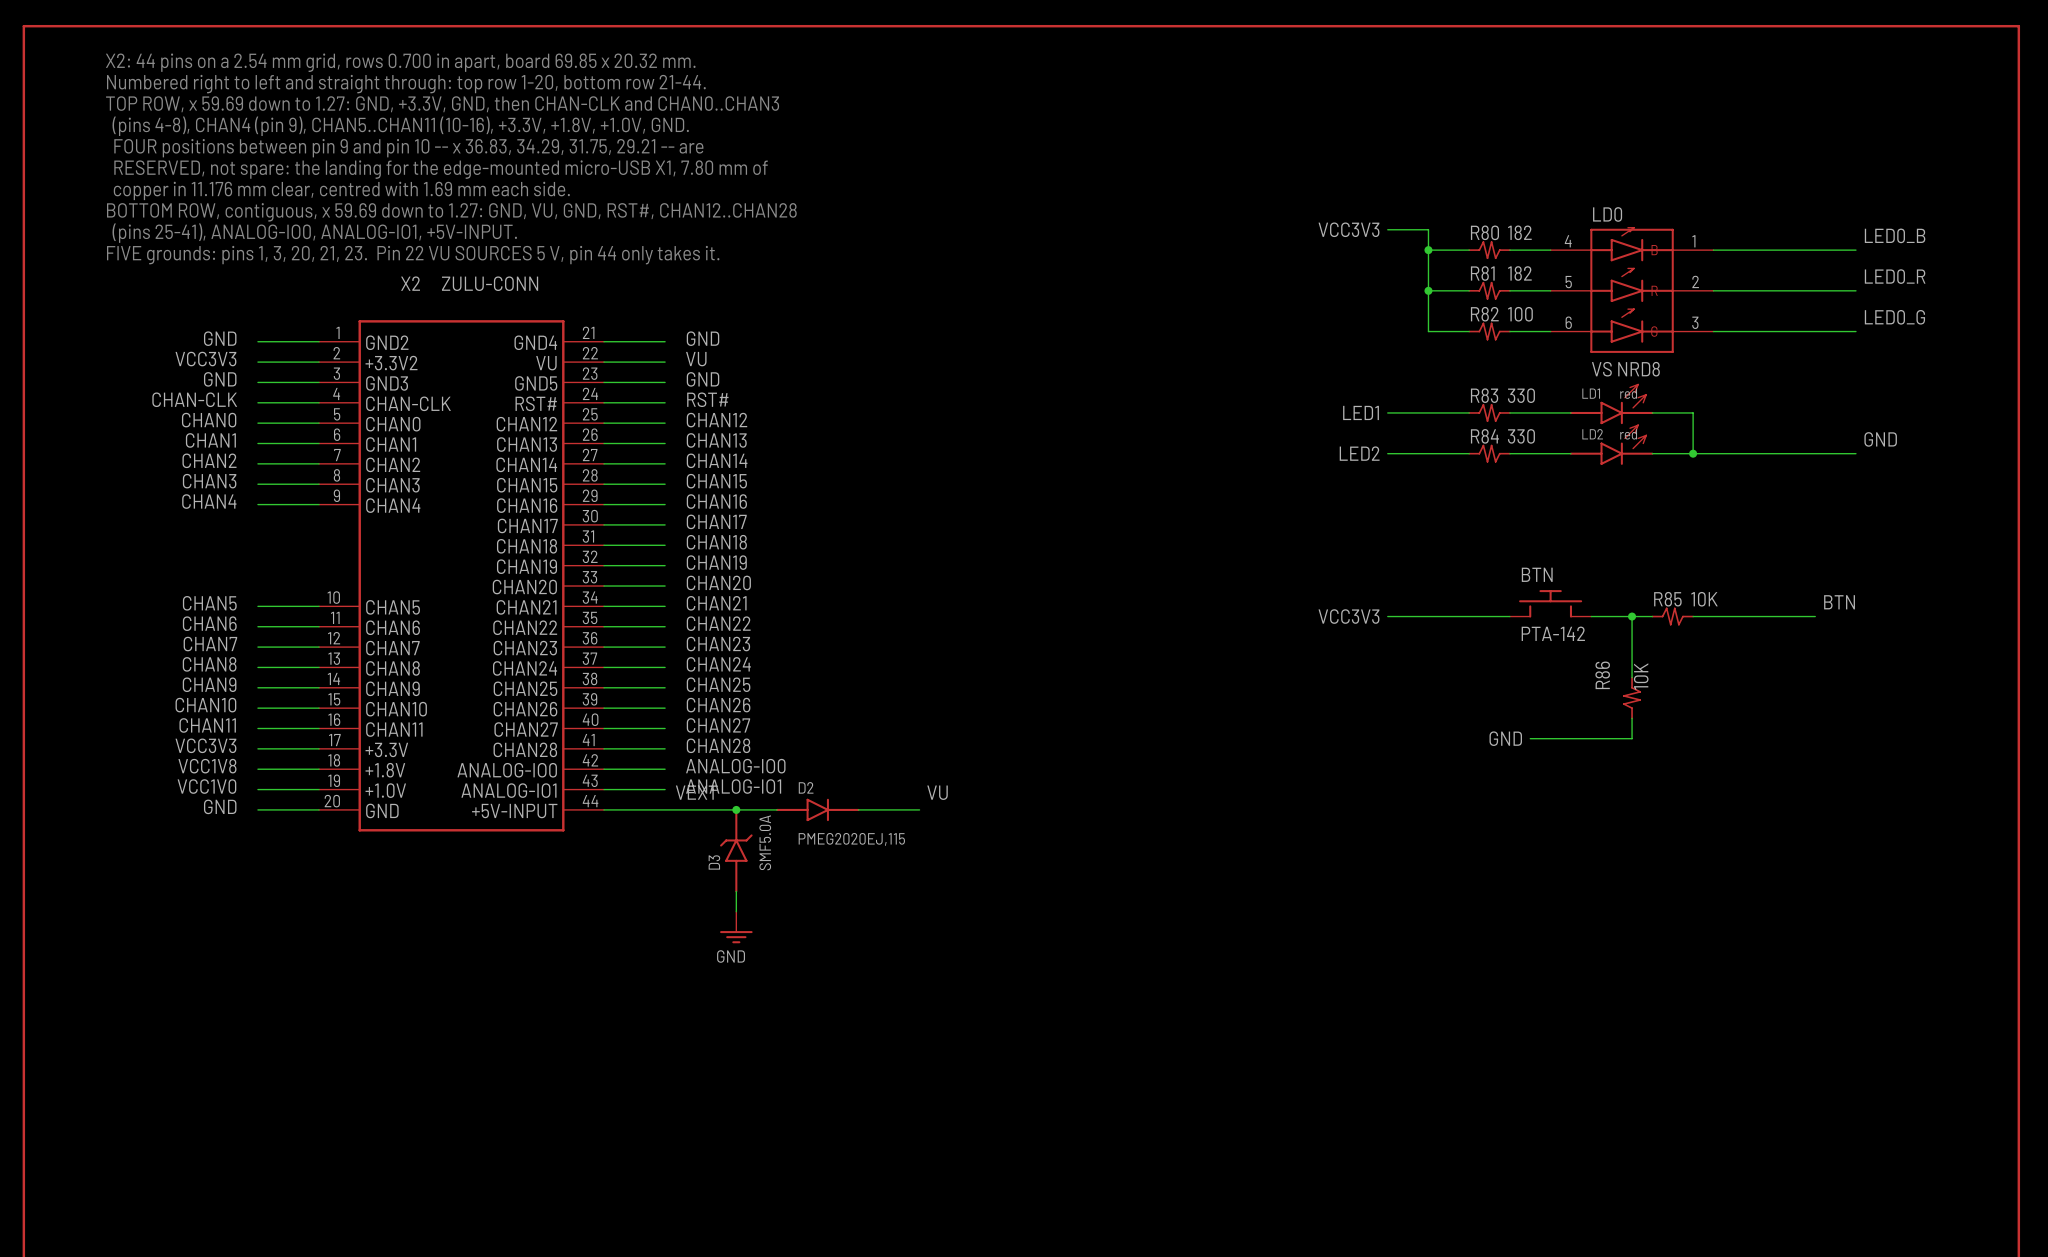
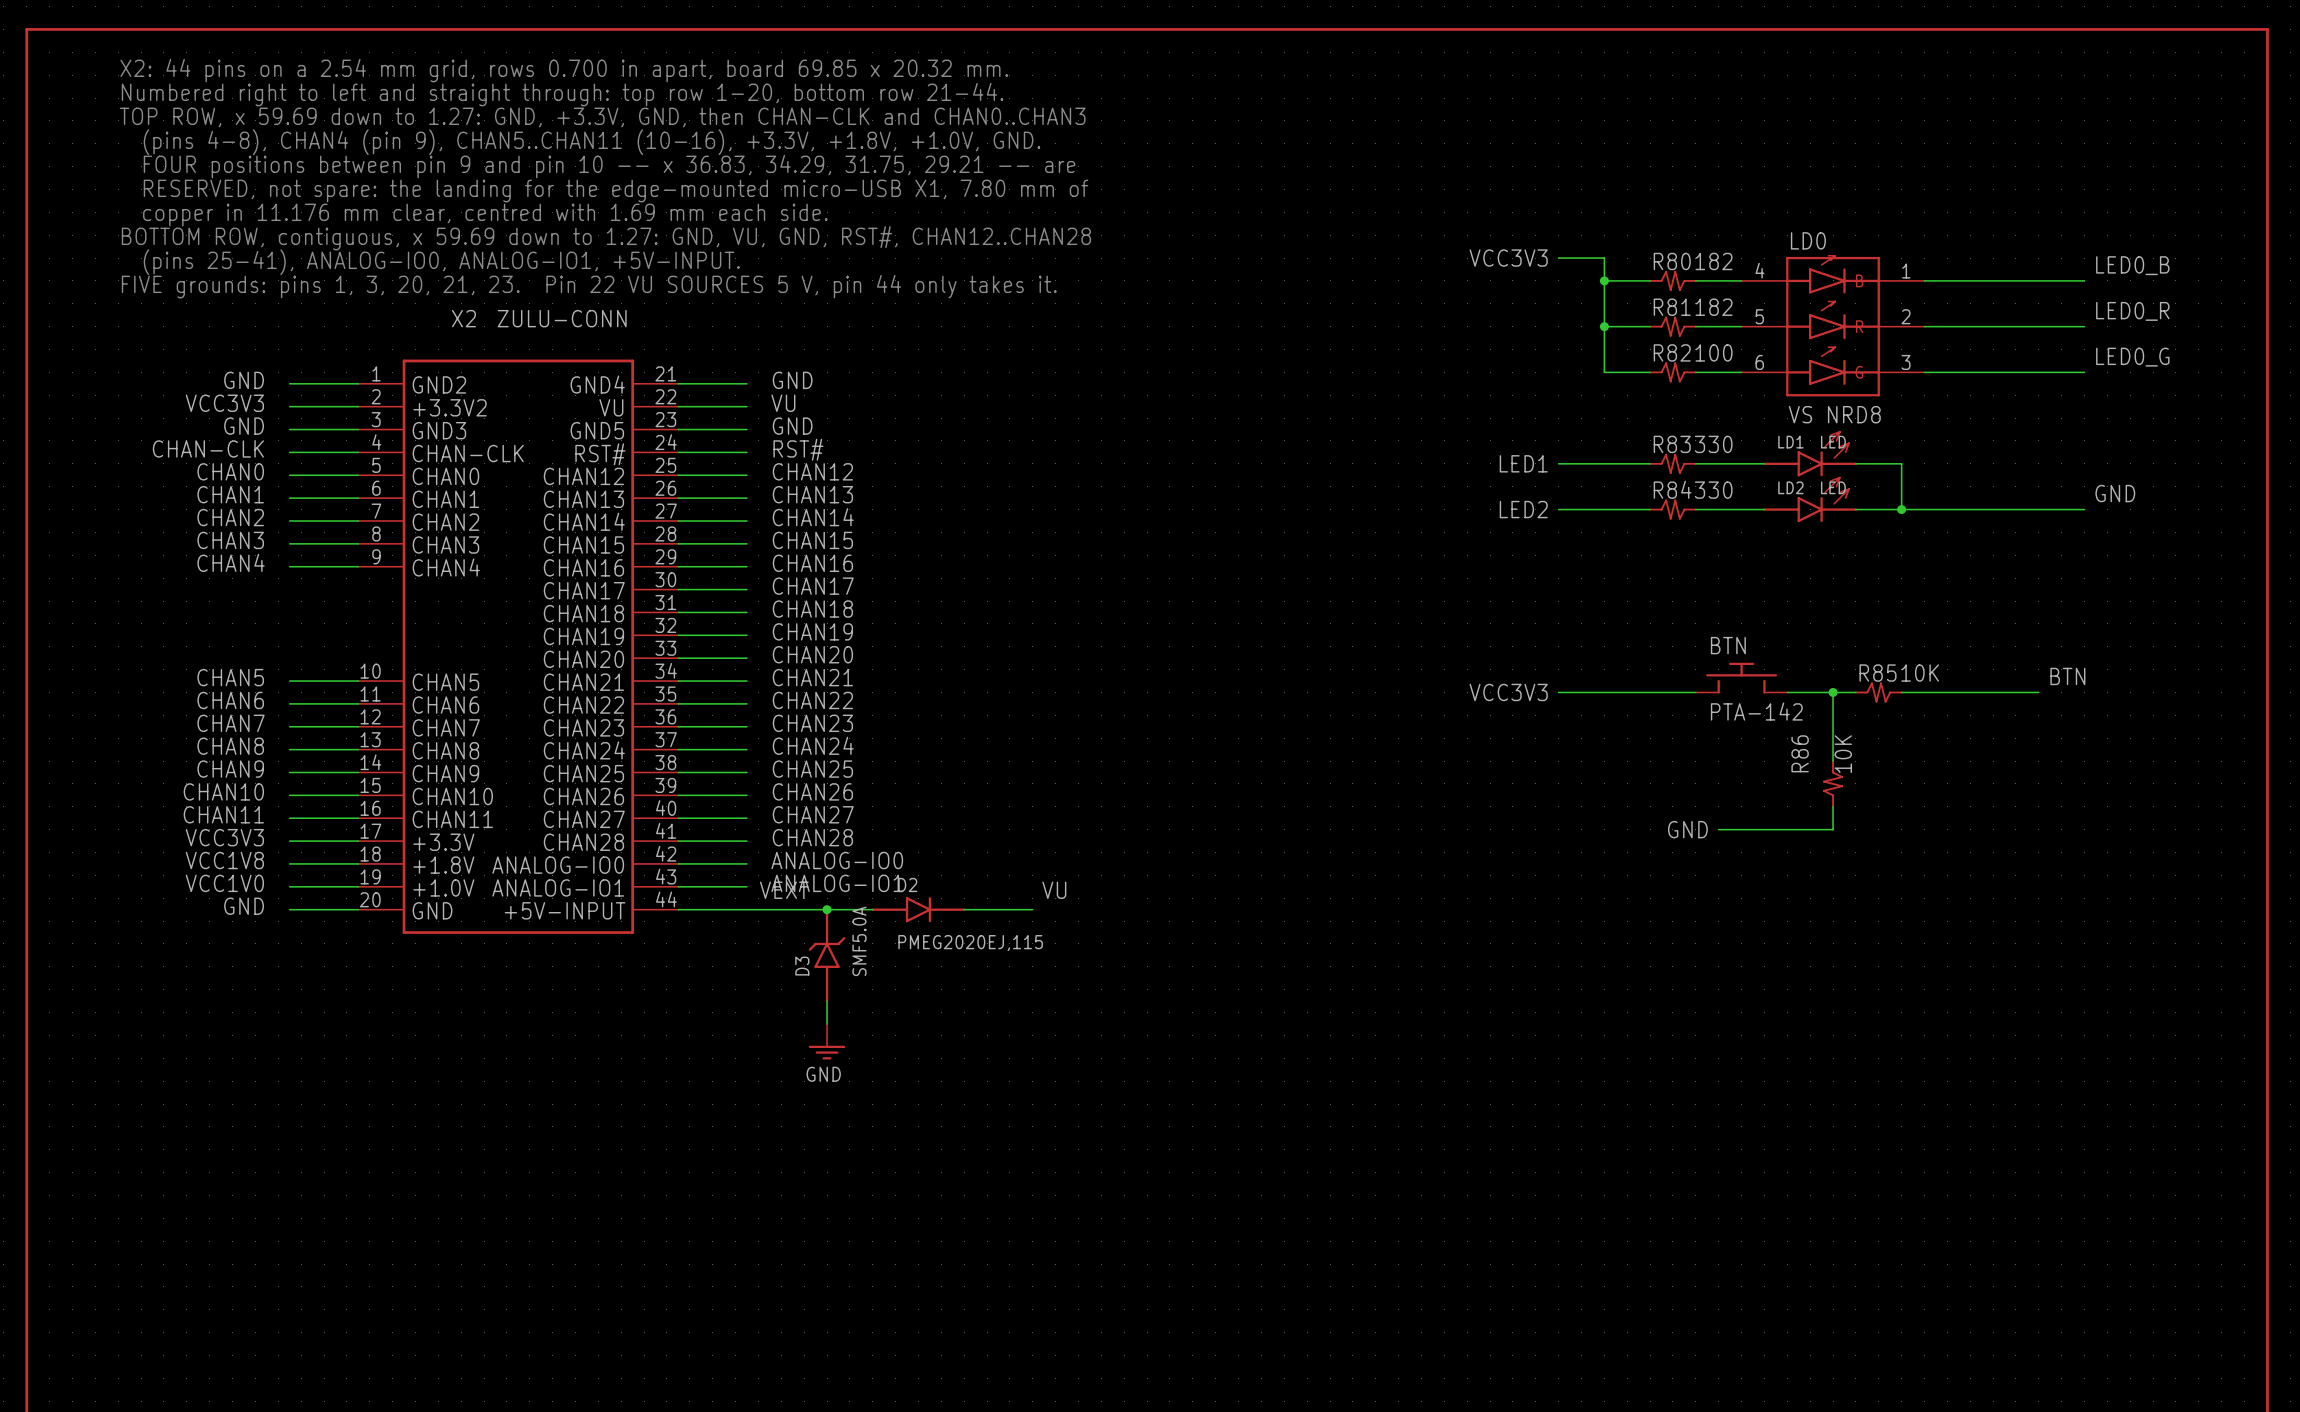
LD1 value: red (1628, 393) -> LED (1833, 442)
LD2 value: red (1628, 434) -> LED (1833, 487)

